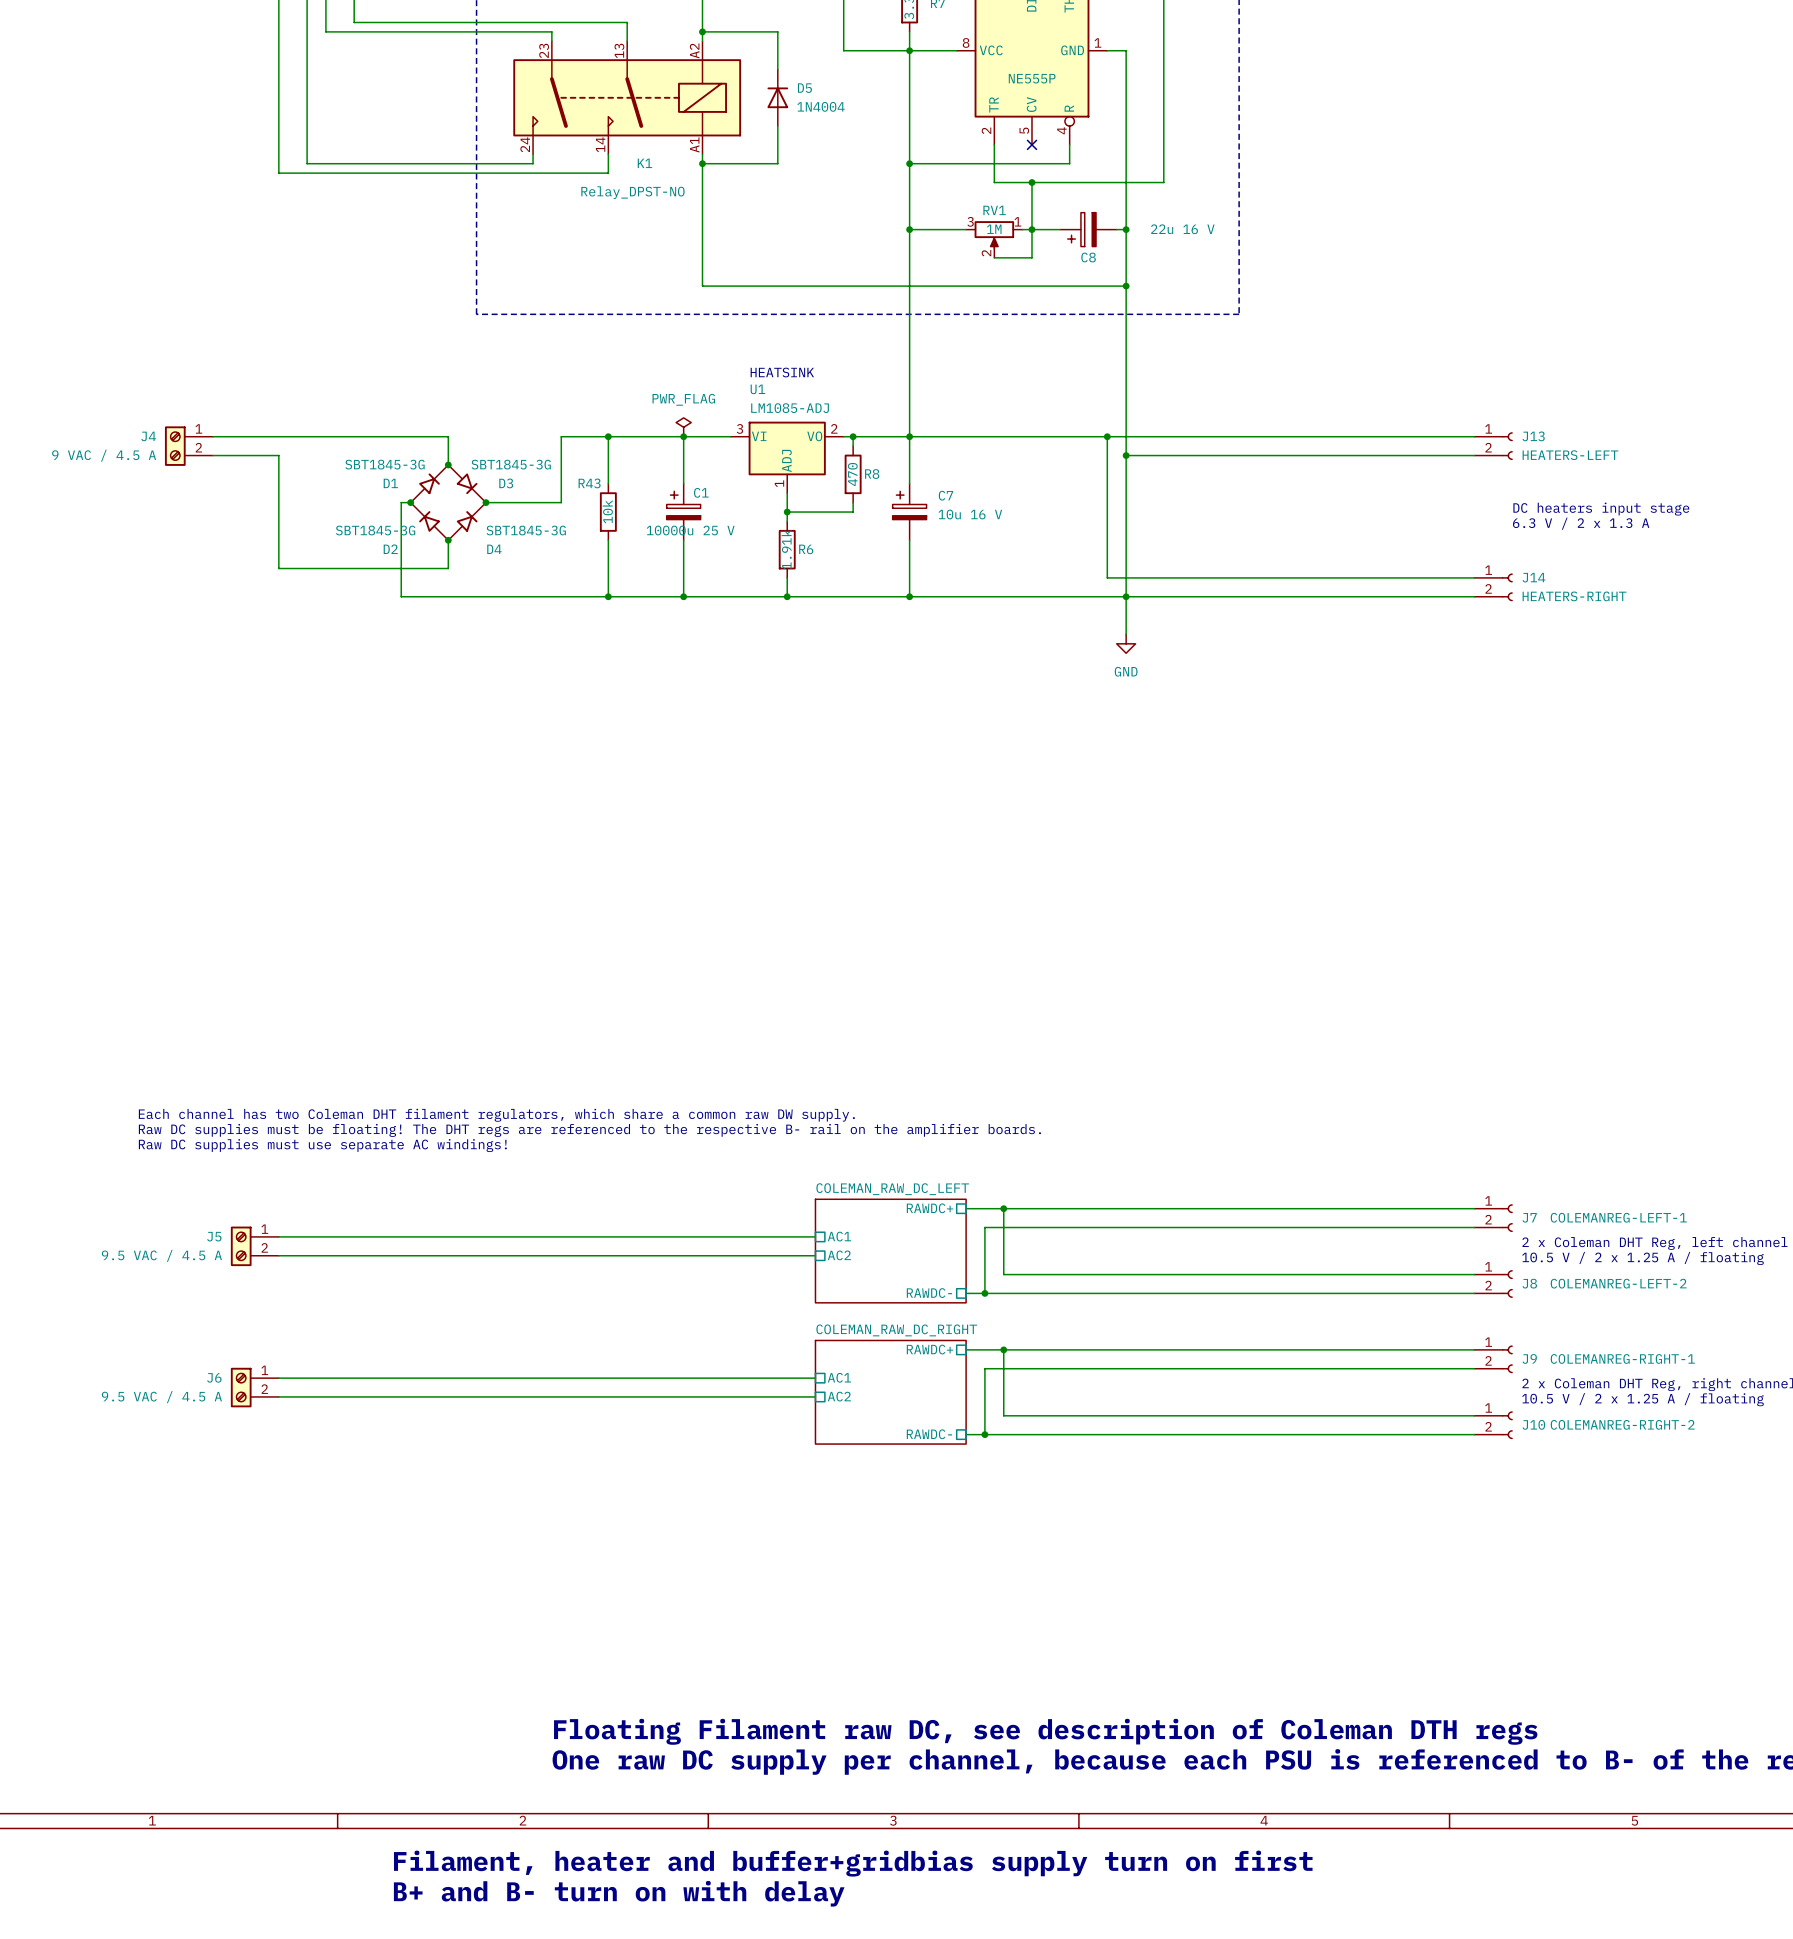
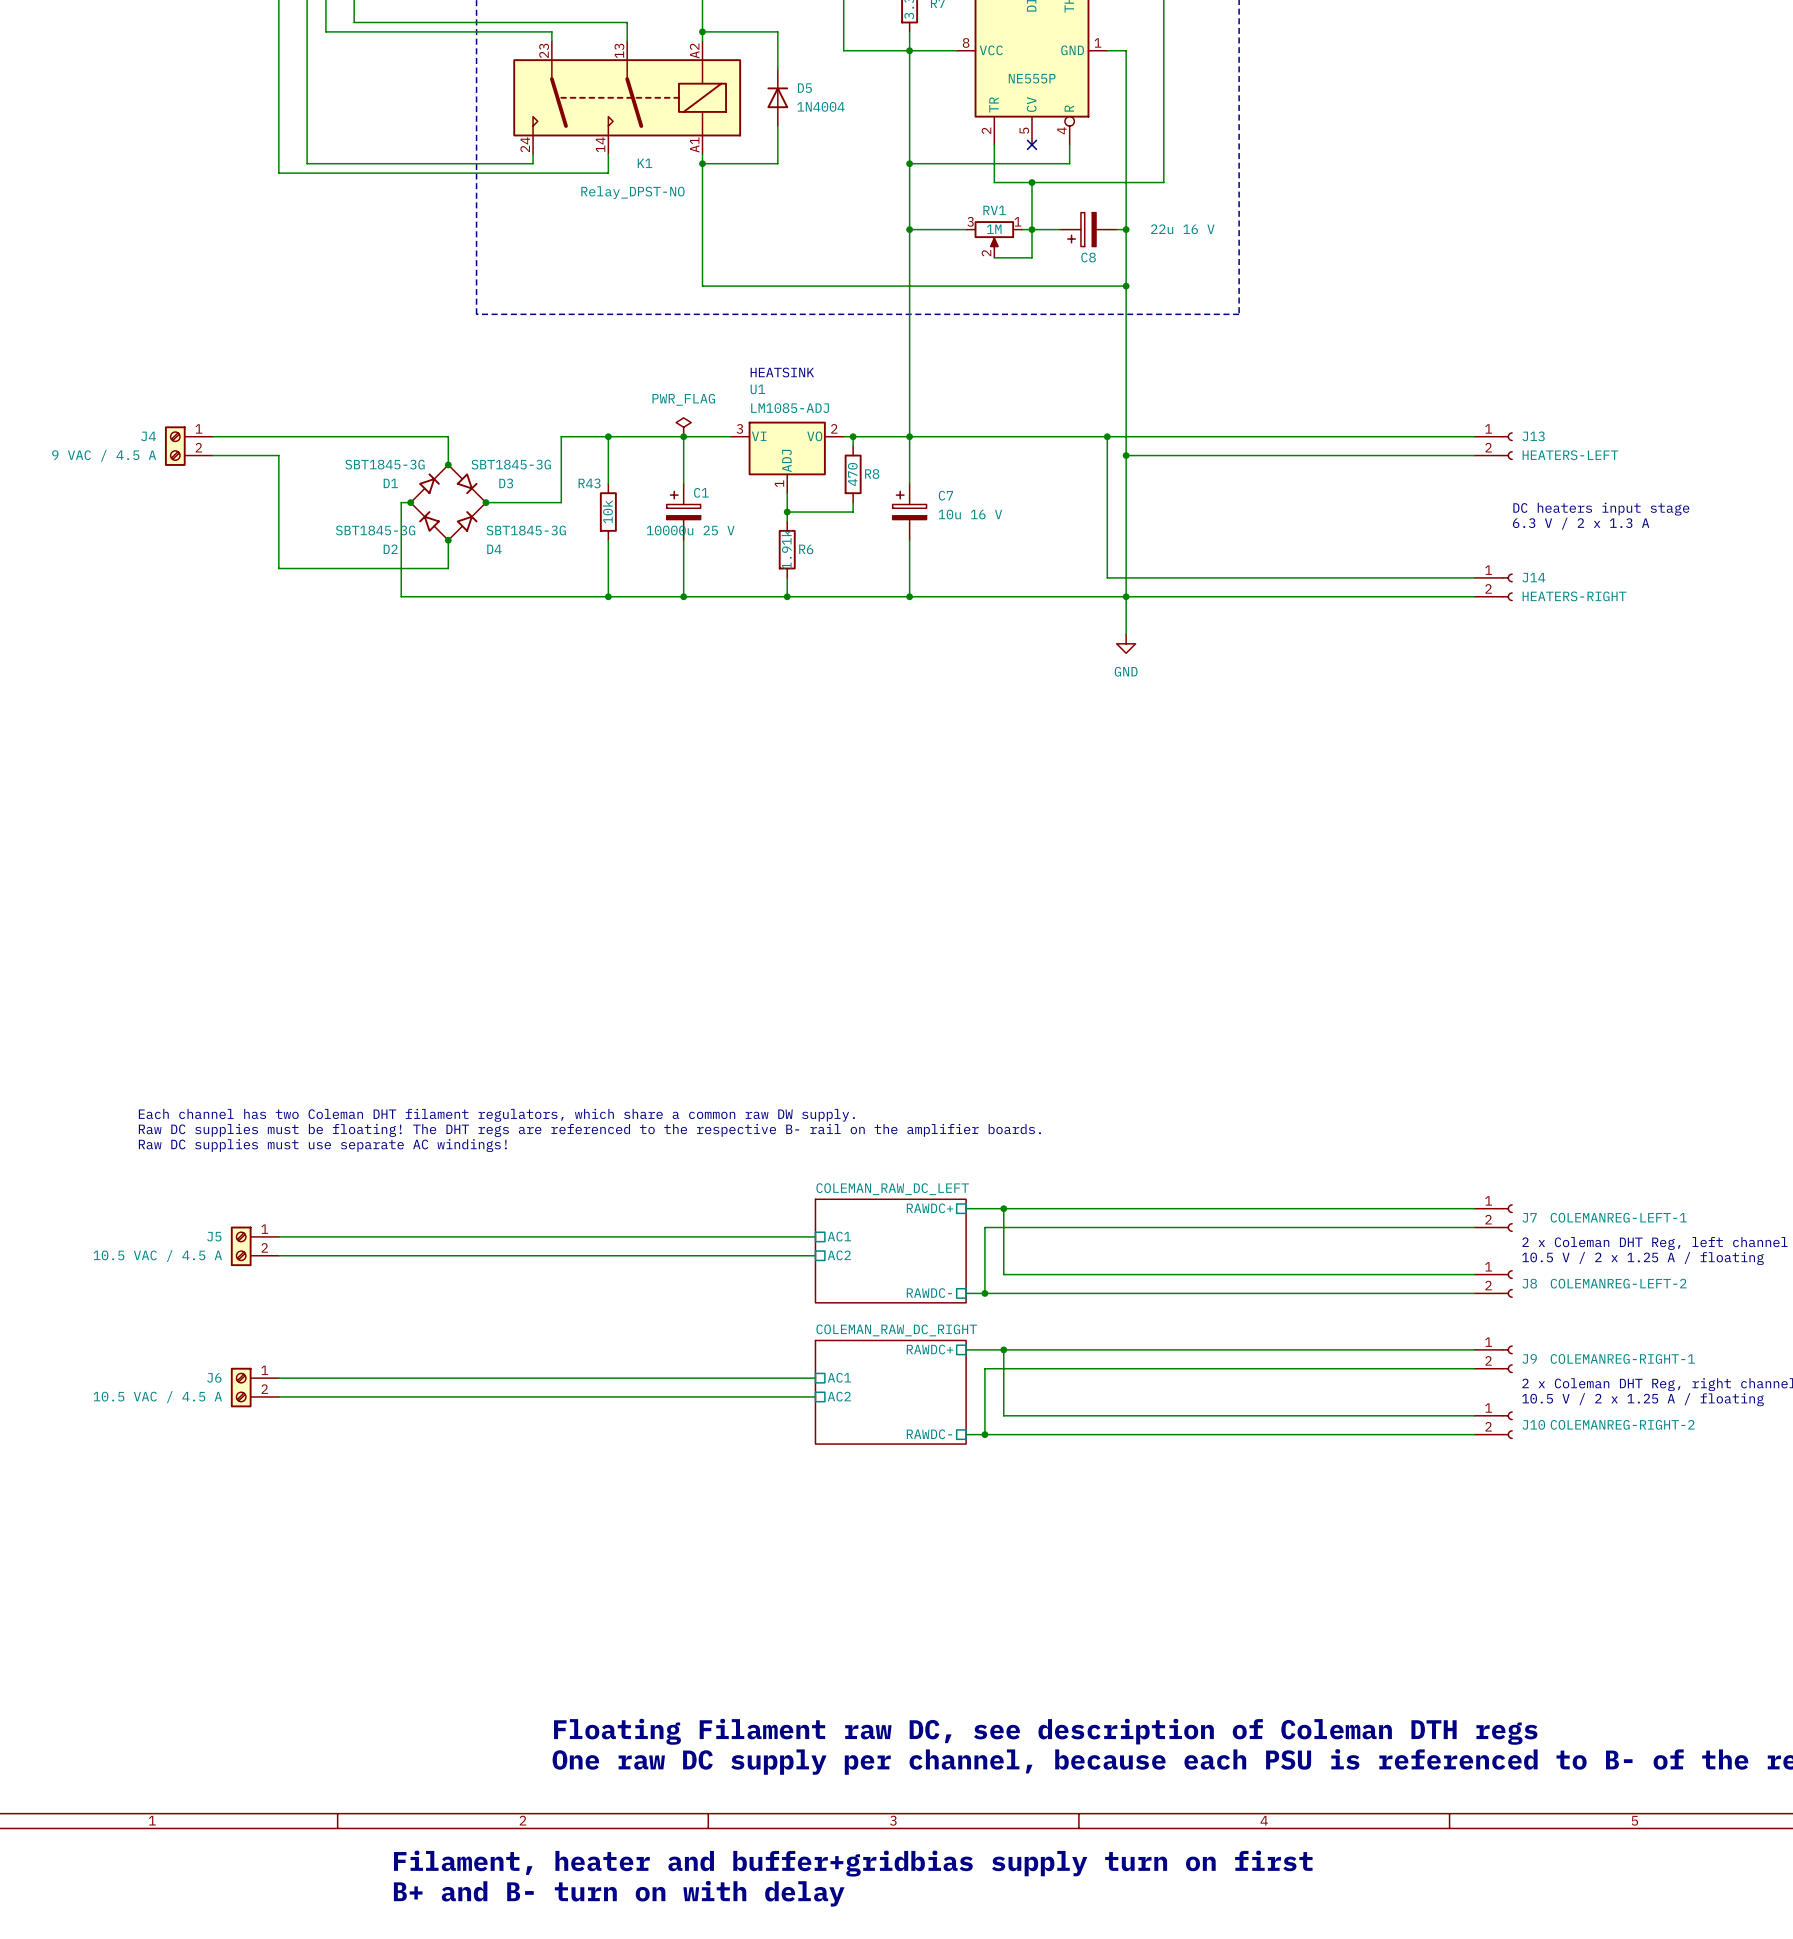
J5 value: 9.5 VAC / 4.5 A (161, 1255) -> 10.5 VAC / 4.5 A (157, 1255)
J6 value: 9.5 VAC / 4.5 A (161, 1397) -> 10.5 VAC / 4.5 A (157, 1397)

